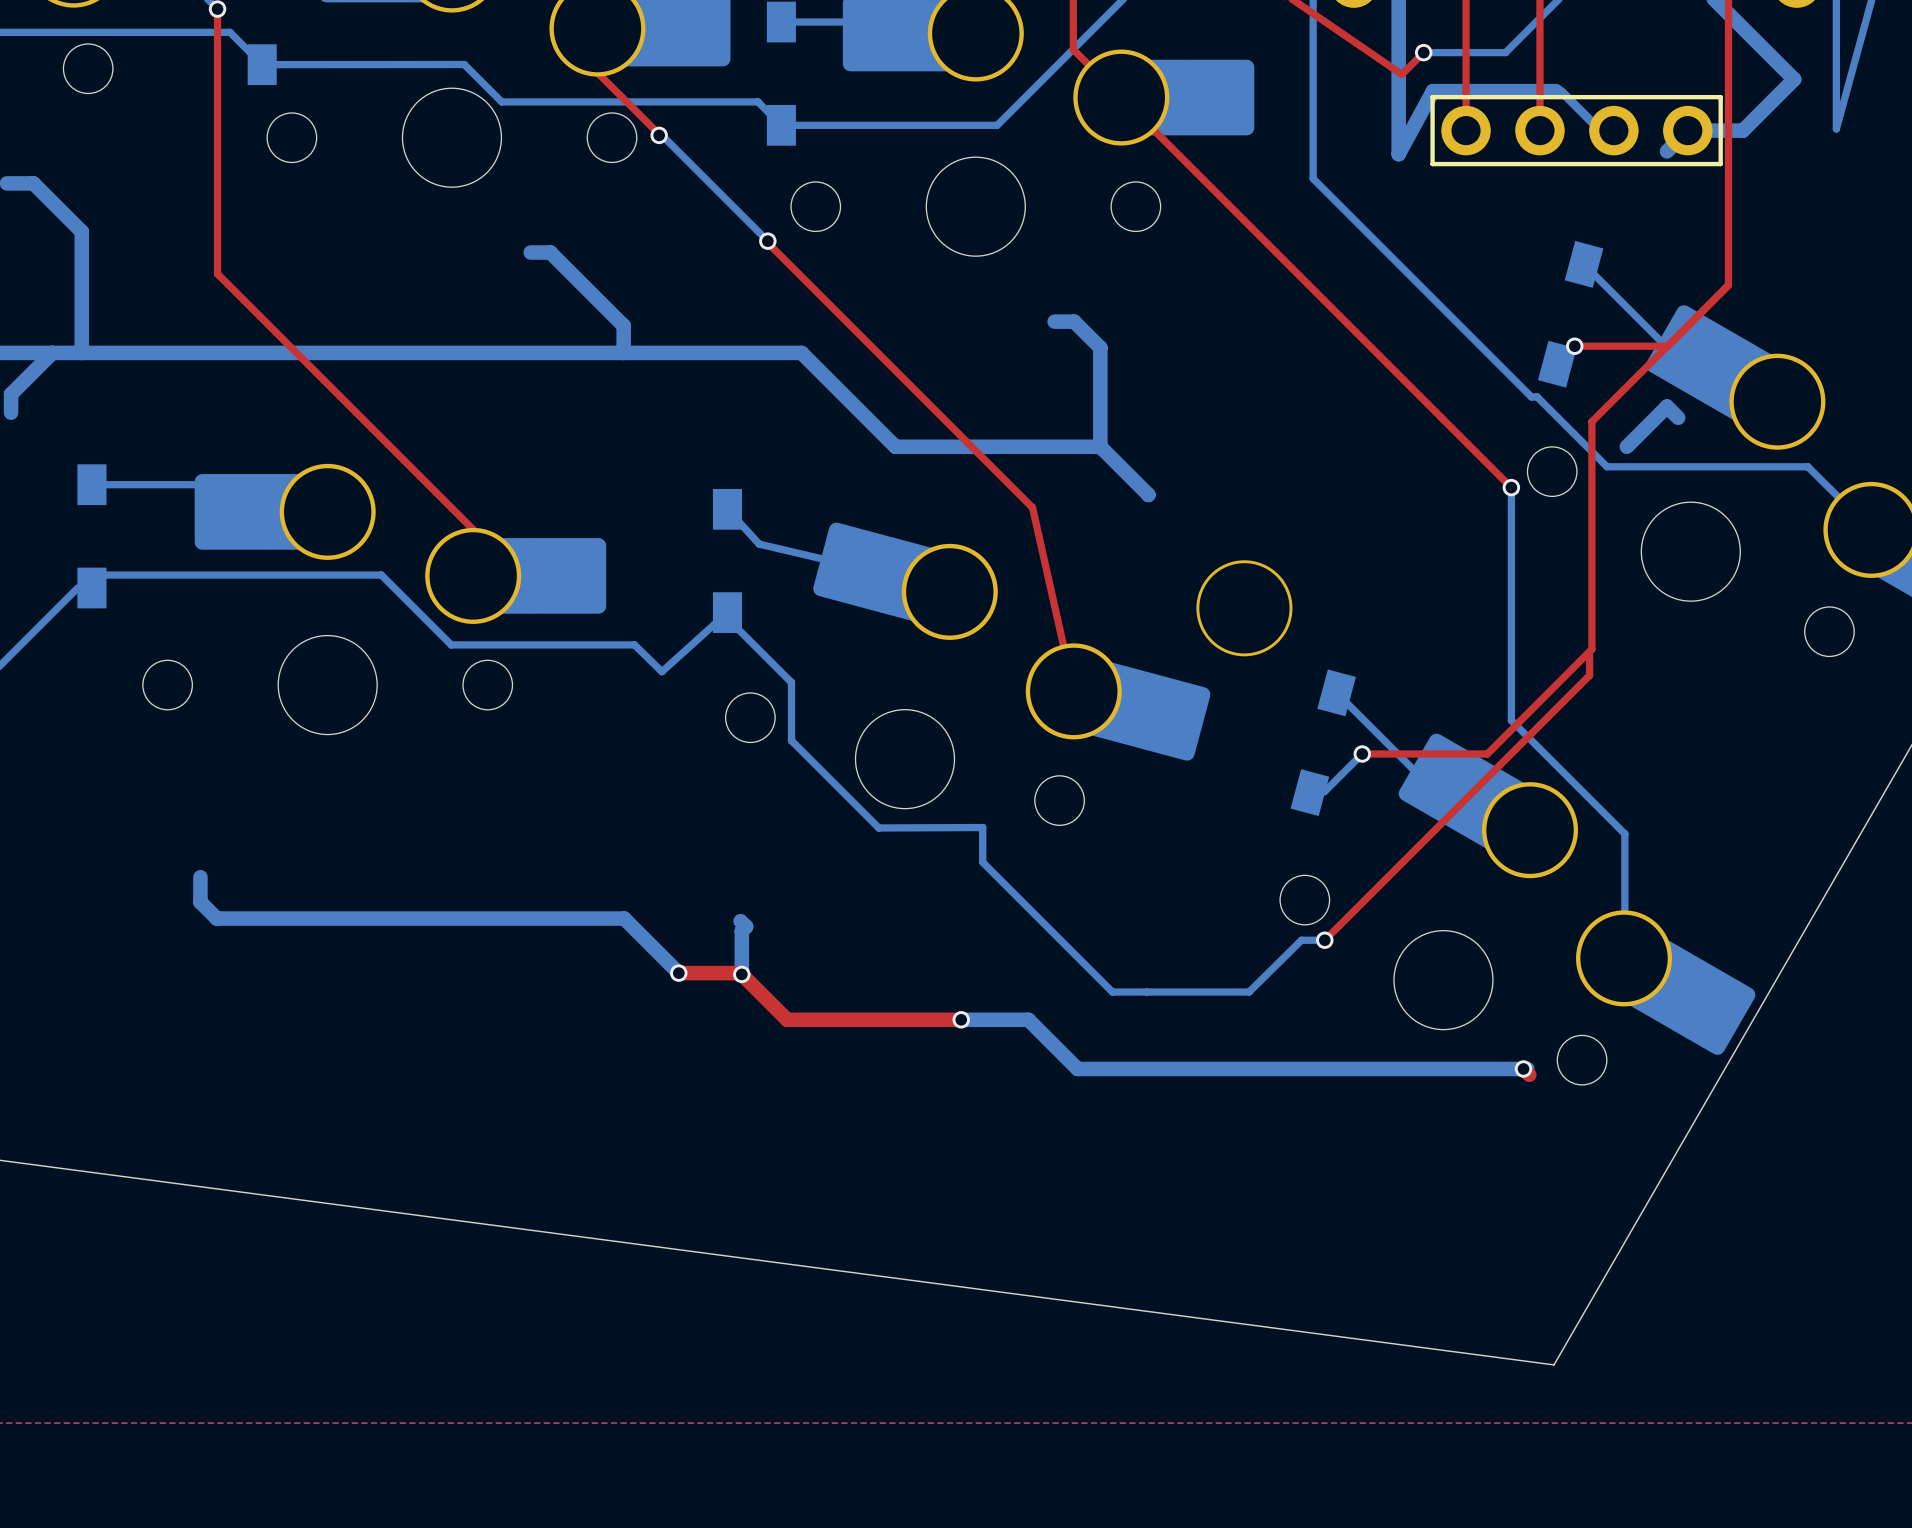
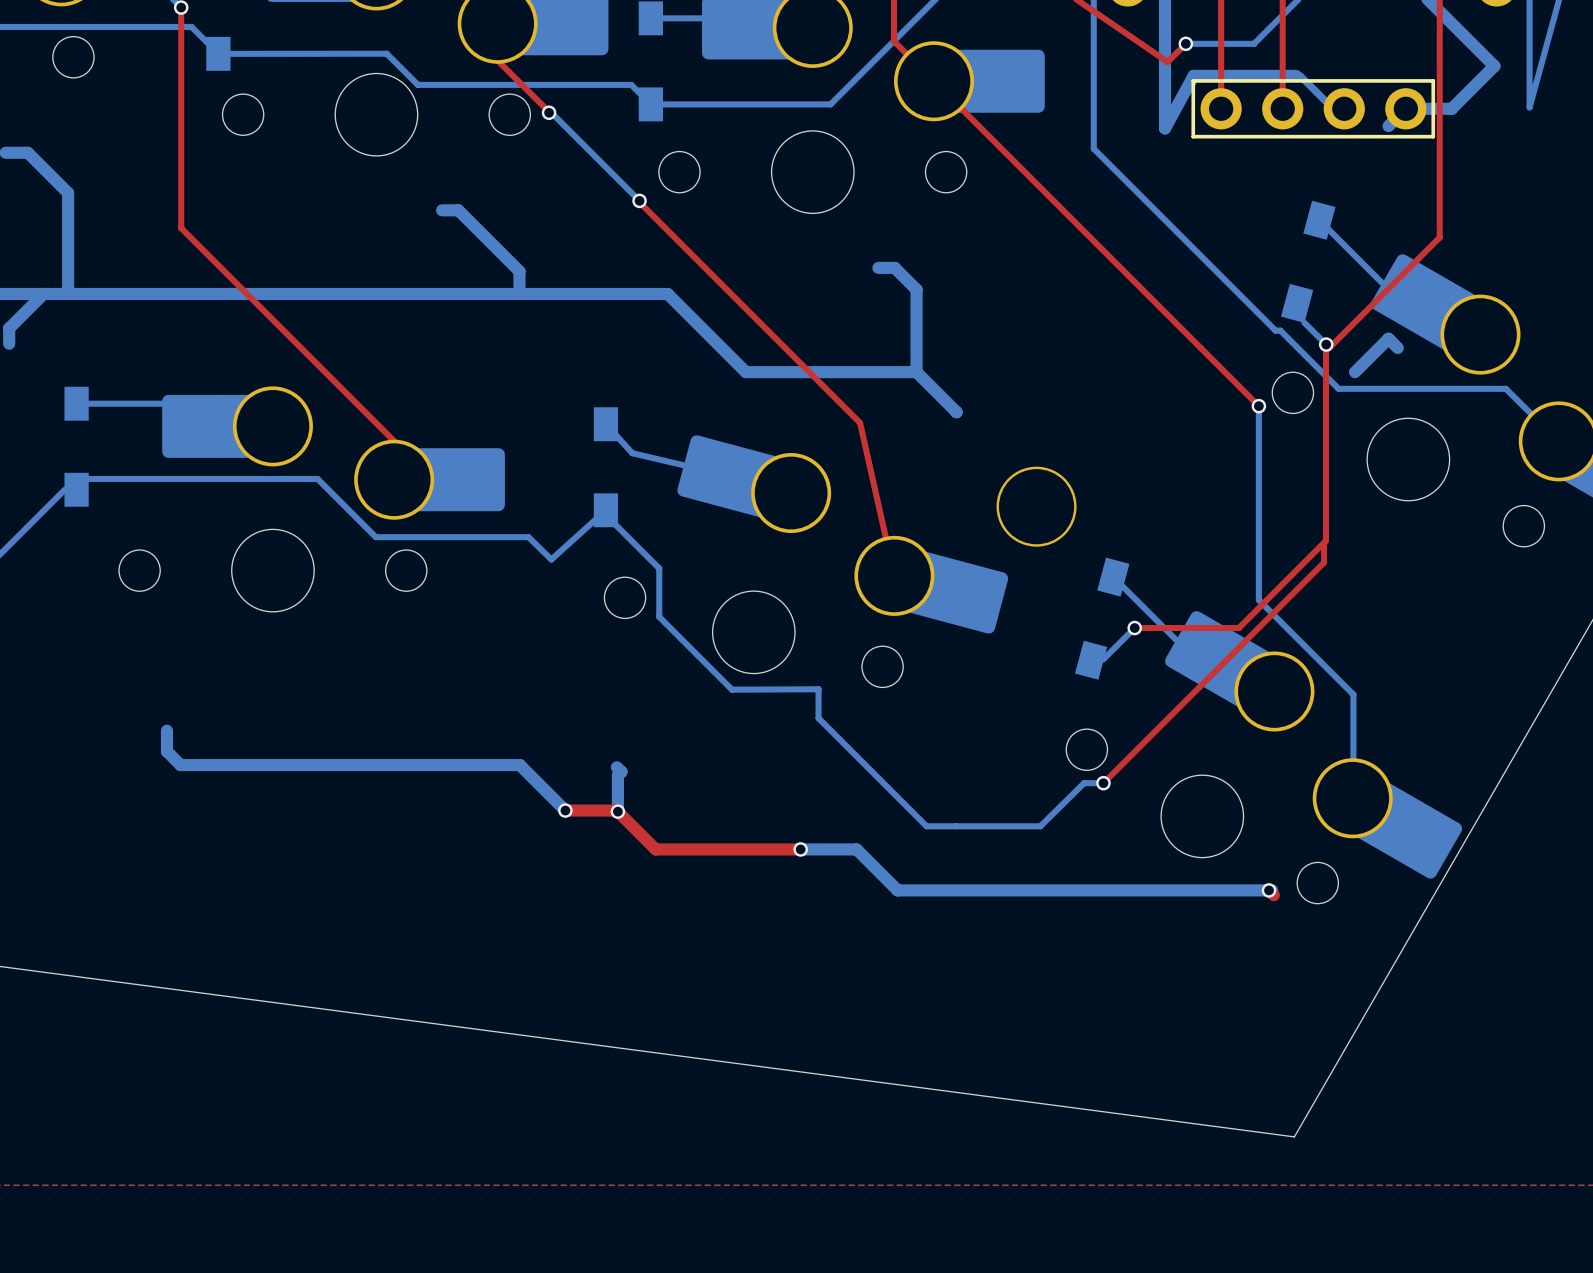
top track: (1728, 285) (1667, 346) (1574, 346) -> none
via position: (1574, 346) -> (1326, 344)
bottom track: none -> (1304, 322) (1326, 344)

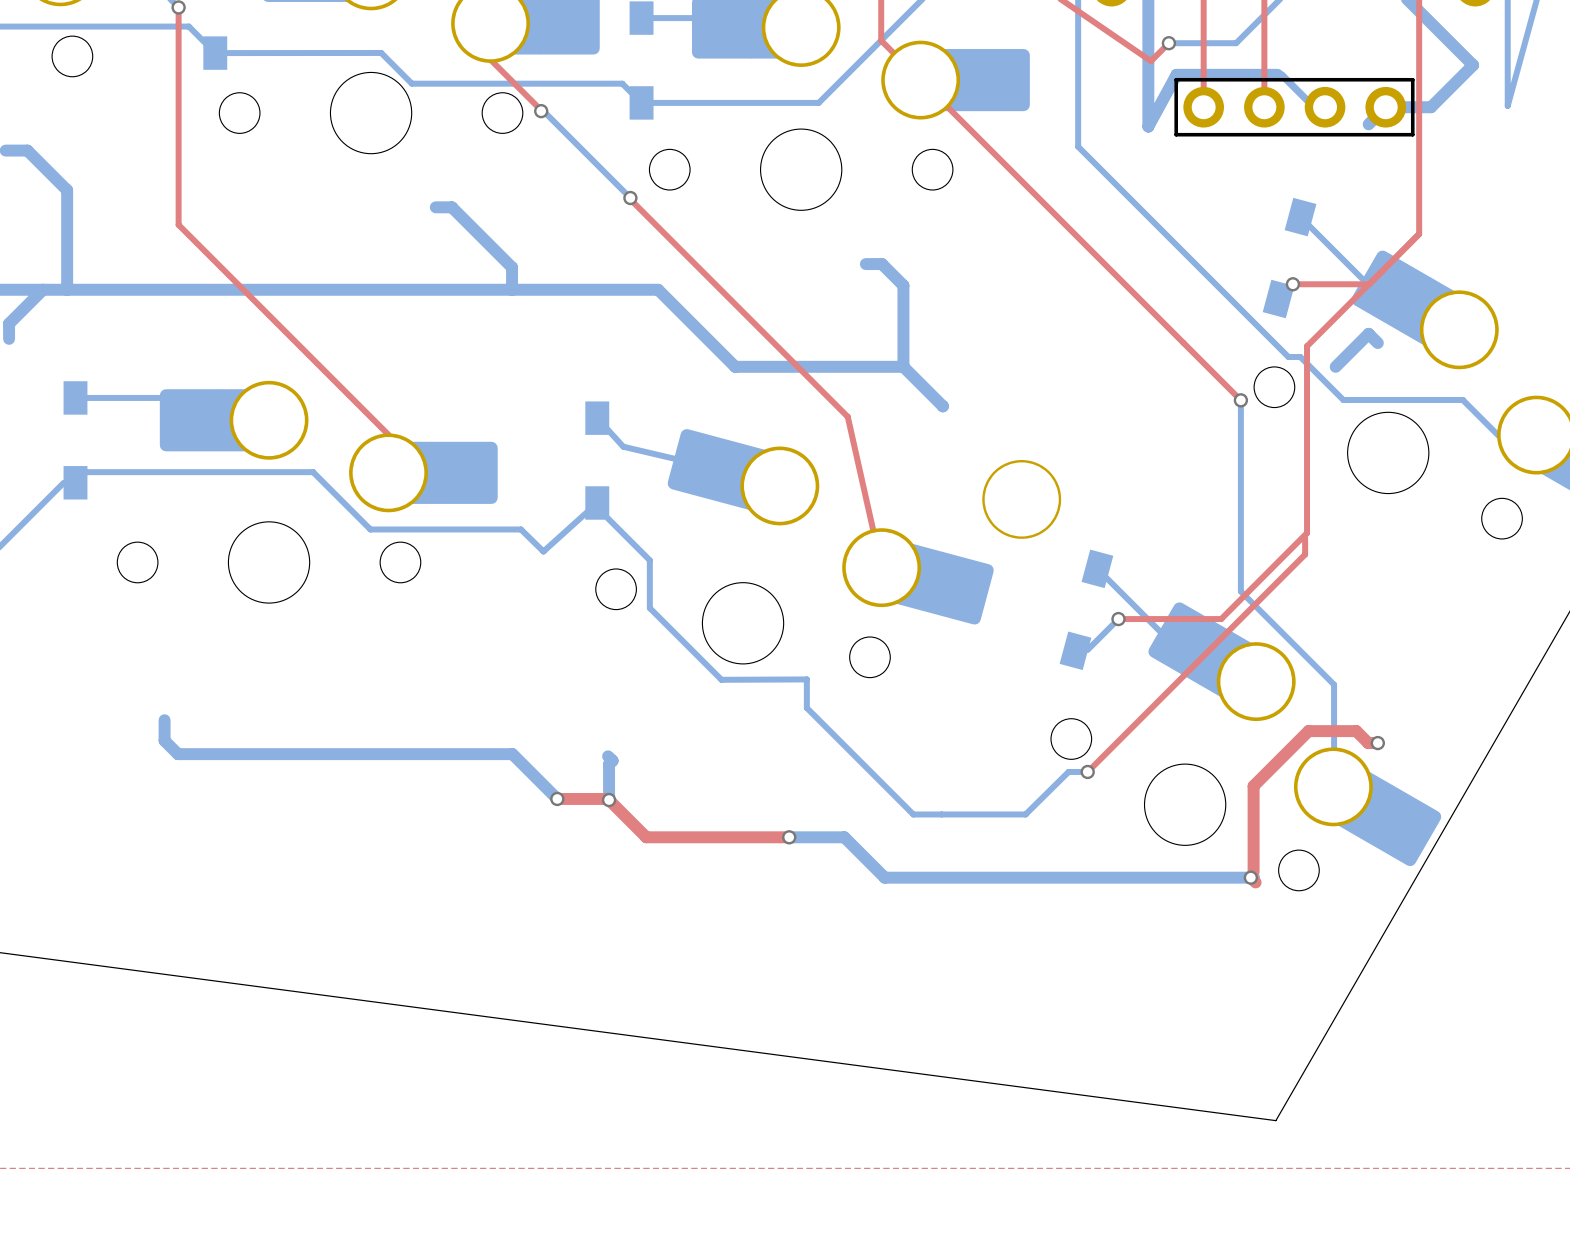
top track: none -> (1419, 234) (1369, 284) (1292, 284)
bottom track: (1304, 322) (1326, 344) -> none
bottom track: (1275, 330) (1280, 330) (1338, 388) (1505, 388) (1558, 441) -> (1257, 325) (1288, 356) (1300, 356) (1343, 399) (1462, 399) (1498, 435)
via position: (1326, 344) -> (1292, 284)
top track: none -> (1377, 743) (1368, 743) (1356, 731) (1308, 731) (1253, 786) (1253, 872)
via: none -> (1377, 743)

